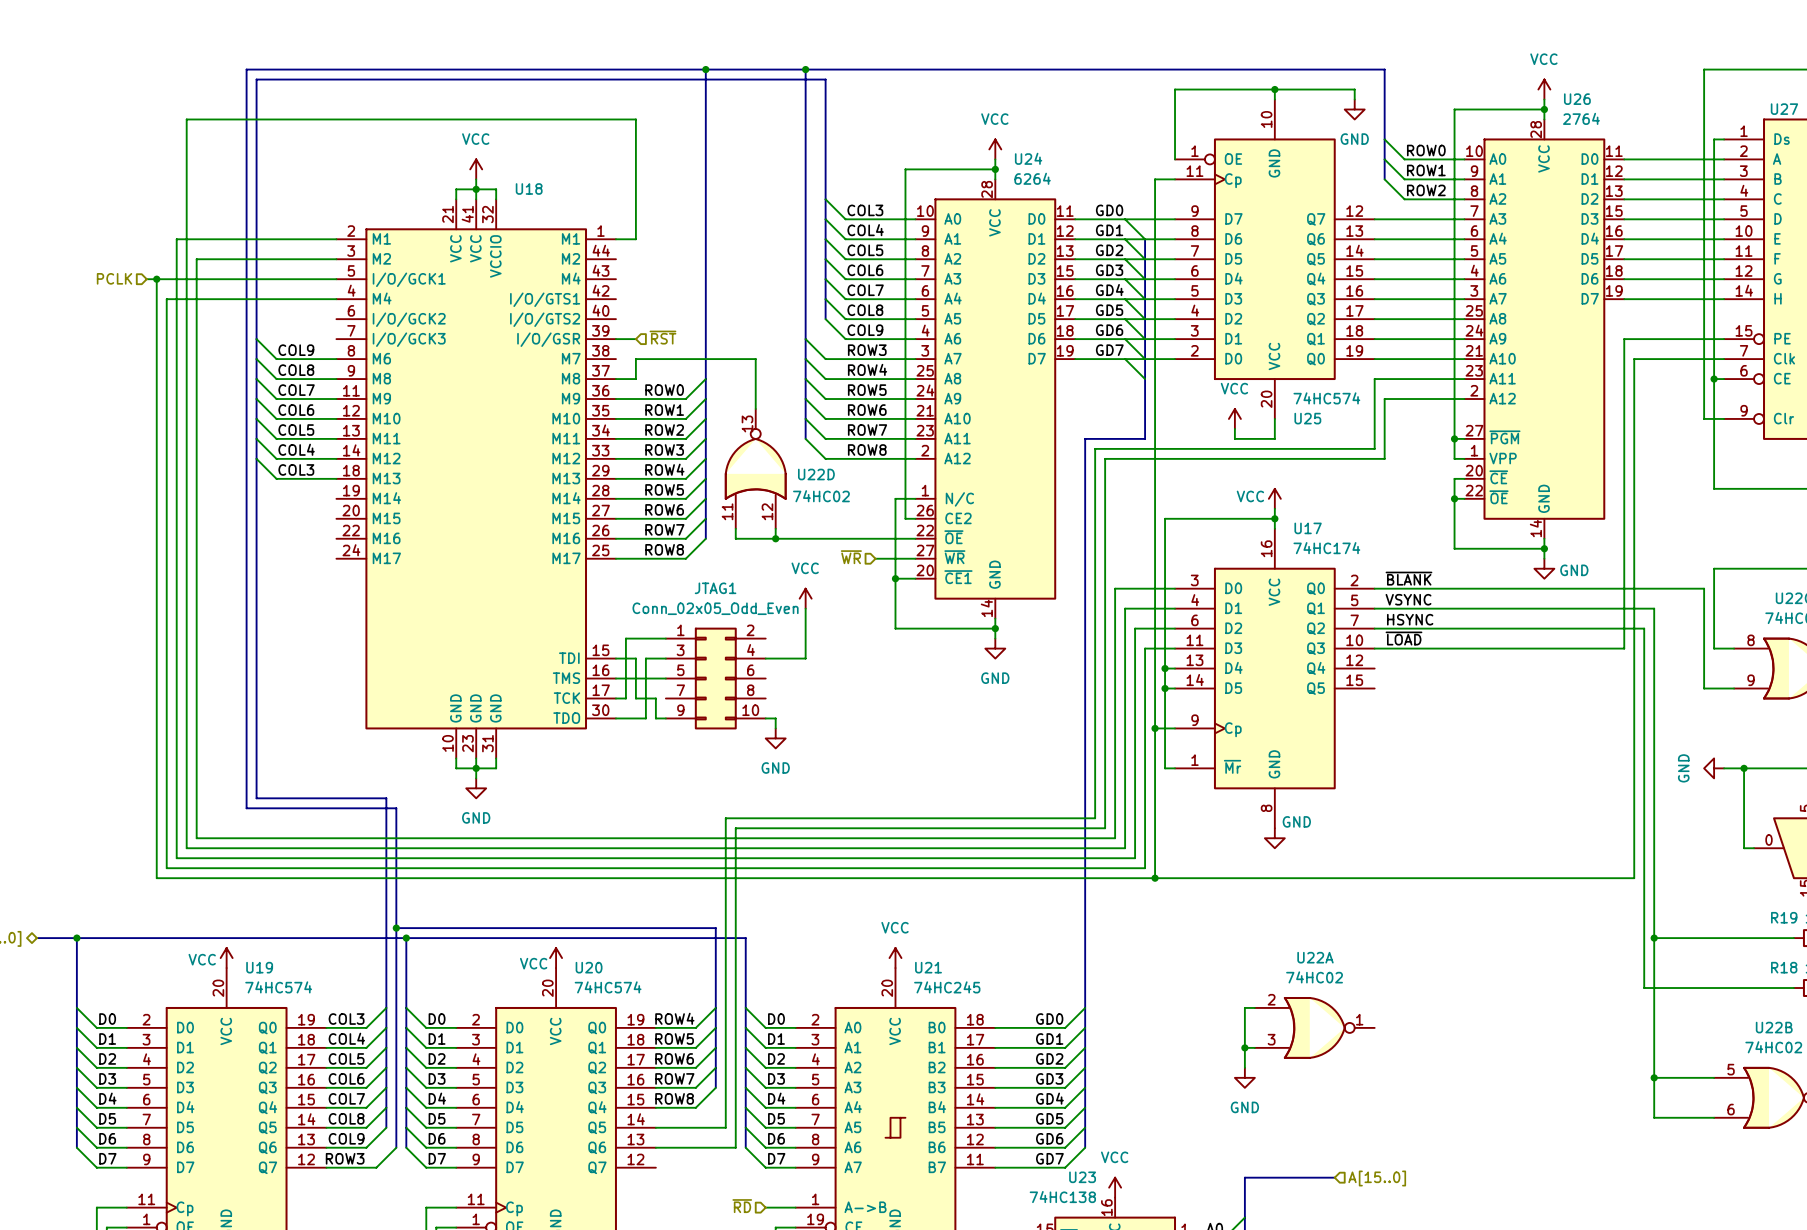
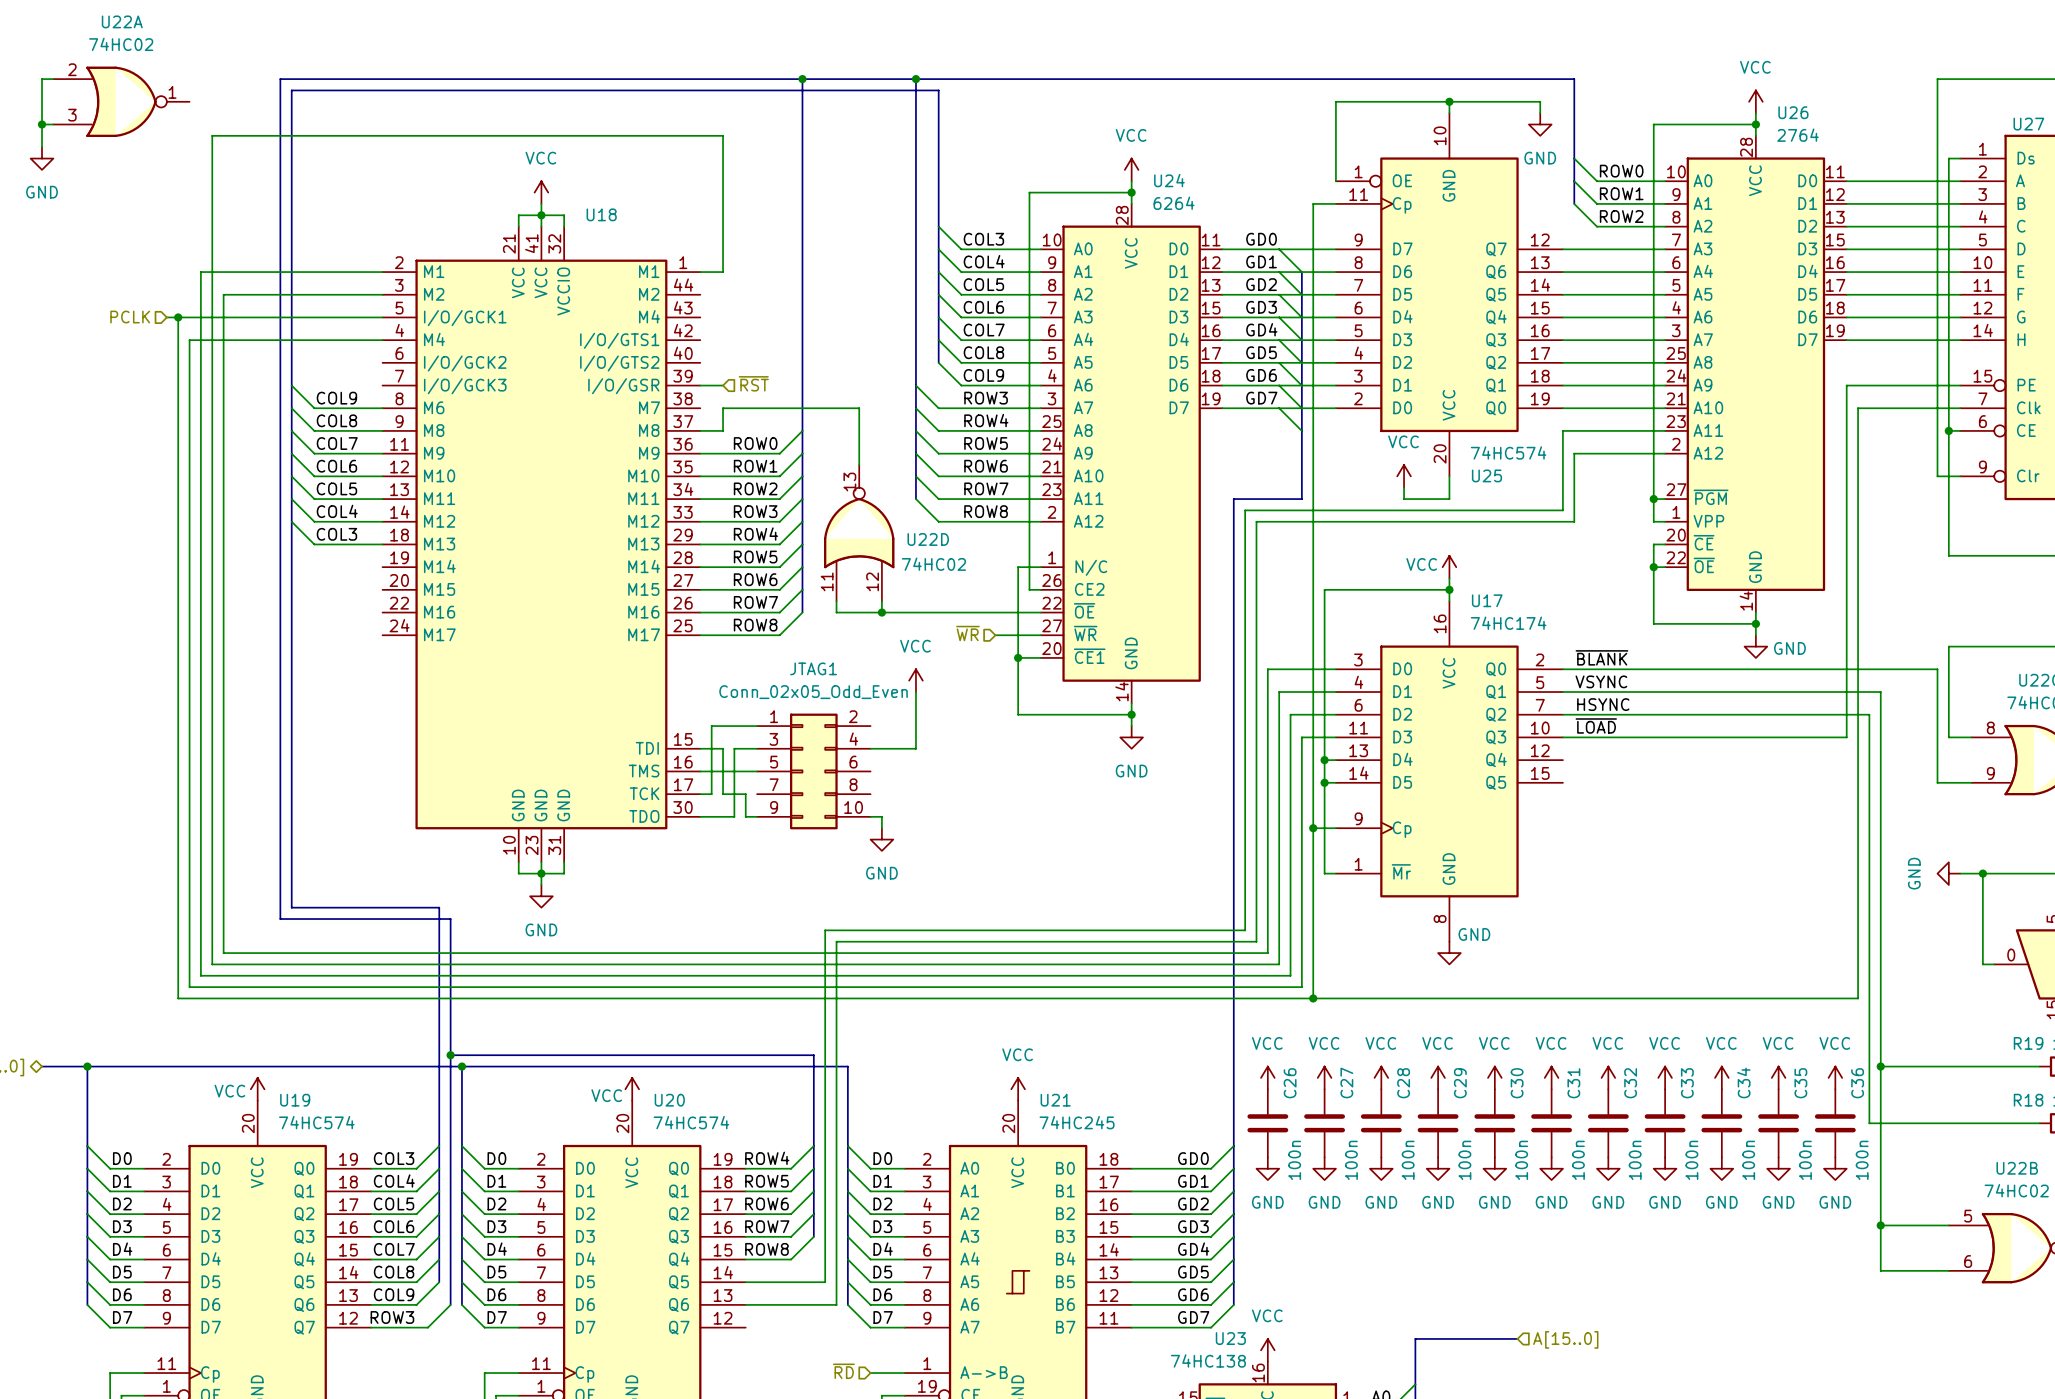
wire: none -> (53, 79) (42, 79) (42, 147)
wire: none -> (42, 124) (53, 124)
junction: none -> (42, 124)
power symbol: none -> GND (42, 158)
power symbol: none -> VCC (1267, 1077)
power symbol: none -> VCC (1324, 1077)
power symbol: none -> VCC (1381, 1077)
power symbol: none -> VCC (1438, 1077)
power symbol: none -> VCC (1494, 1077)
power symbol: none -> VCC (1551, 1077)
power symbol: none -> VCC (1608, 1077)
power symbol: none -> VCC (1665, 1077)
power symbol: none -> VCC (1721, 1077)
power symbol: none -> VCC (1778, 1077)
power symbol: none -> VCC (1835, 1077)
C26: none -> 100n (1267, 1123)
C27: none -> 100n (1324, 1123)
C28: none -> 100n (1381, 1123)
C29: none -> 100n (1438, 1123)
C30: none -> 100n (1494, 1123)
C31: none -> 100n (1551, 1123)
C32: none -> 100n (1608, 1123)
C33: none -> 100n (1665, 1123)
C34: none -> 100n (1721, 1123)
C35: none -> 100n (1778, 1123)
C36: none -> 100n (1835, 1123)
wire: (1254, 1007) (1244, 1007) (1244, 1067) -> none
power symbol: none -> GND (1267, 1168)
power symbol: none -> GND (1324, 1168)
power symbol: none -> GND (1381, 1168)
power symbol: none -> GND (1438, 1168)
U22A position: (1314, 1027) -> (121, 101)
power symbol: none -> GND (1494, 1168)
power symbol: none -> GND (1551, 1168)
power symbol: none -> GND (1608, 1168)
power symbol: none -> GND (1665, 1168)
power symbol: none -> GND (1721, 1168)
power symbol: none -> GND (1778, 1168)
power symbol: none -> GND (1835, 1168)
wire: (1244, 1047) (1254, 1047) -> none
junction: (1244, 1047) -> none
power symbol: GND (1244, 1077) -> none

